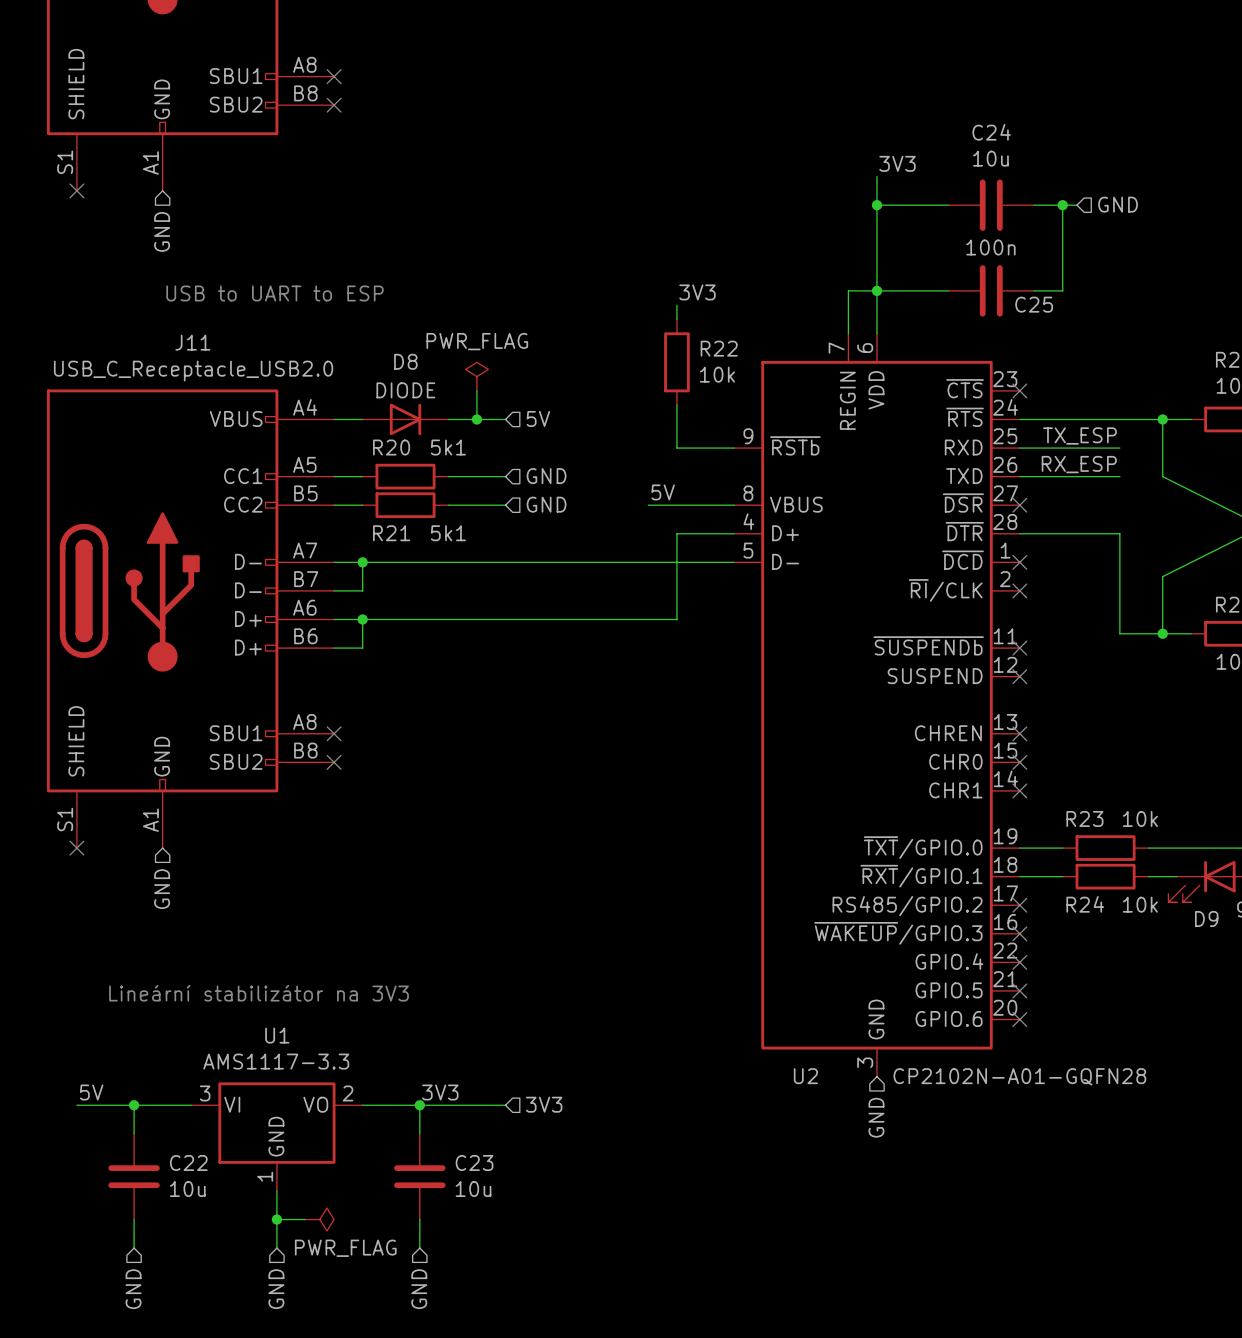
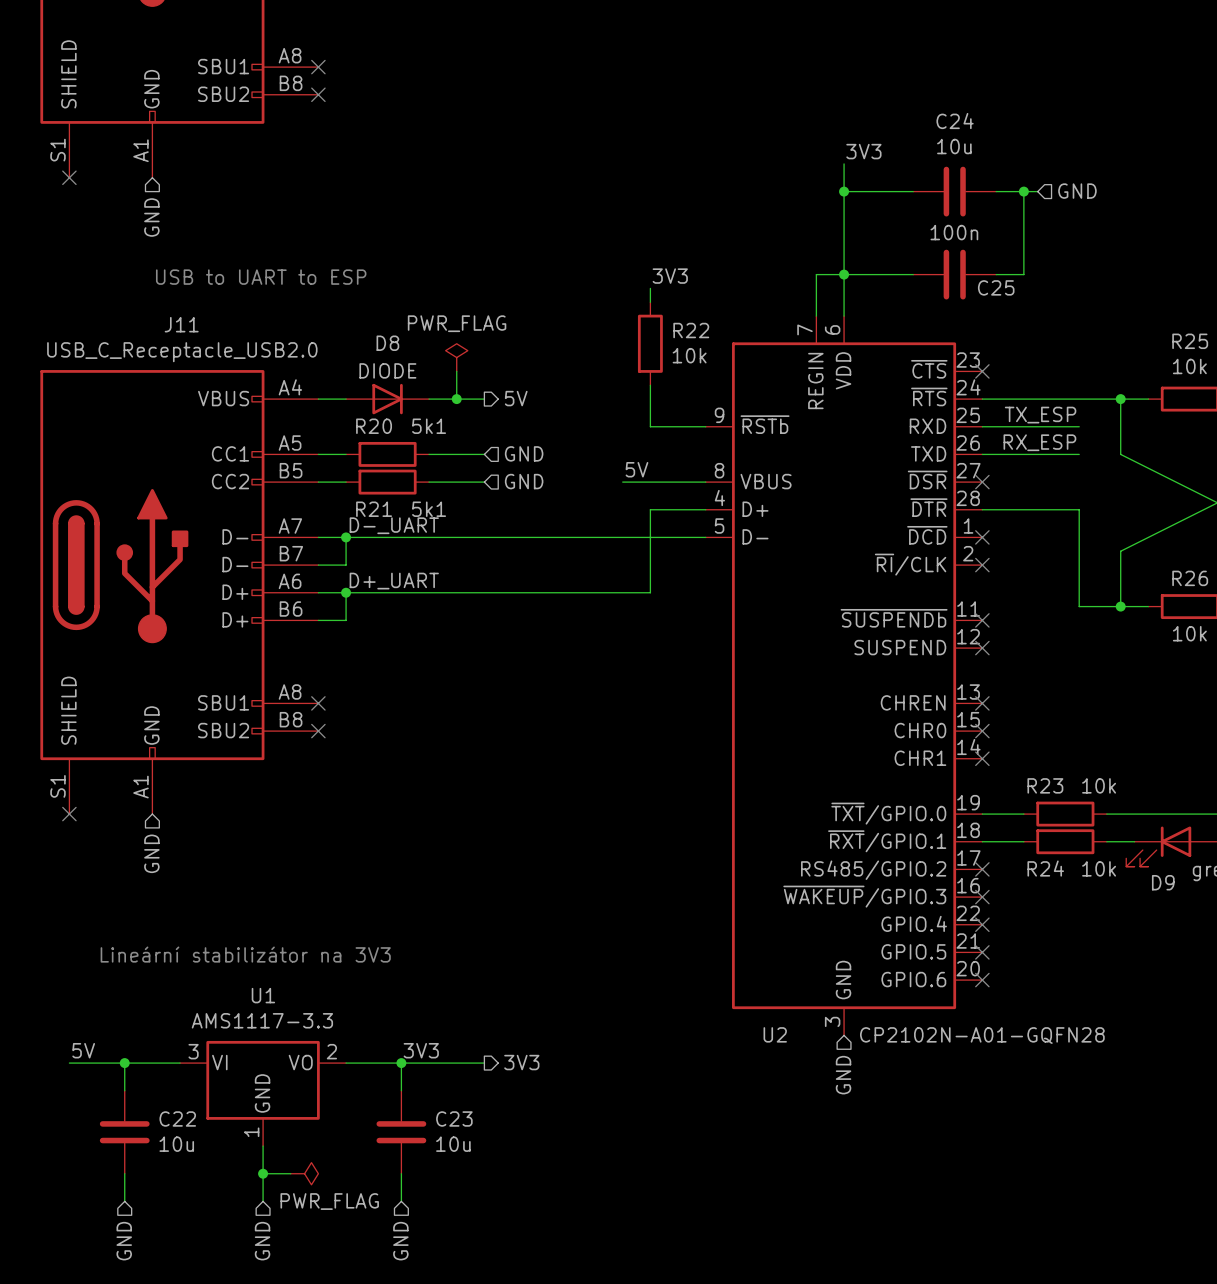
hierarchical label shape: input (538, 418) -> output (516, 398)
label: none -> D-_UART (394, 525)
label: none -> D+_UART (394, 581)
hierarchical label shape: input (544, 1104) -> output (521, 1062)

